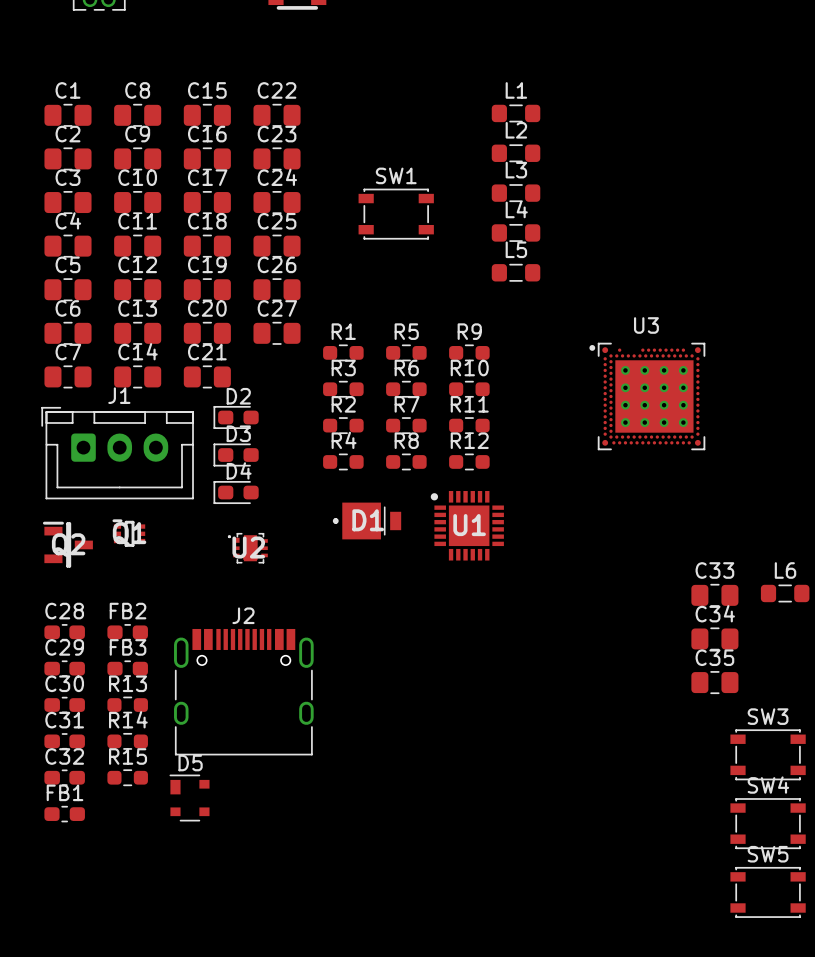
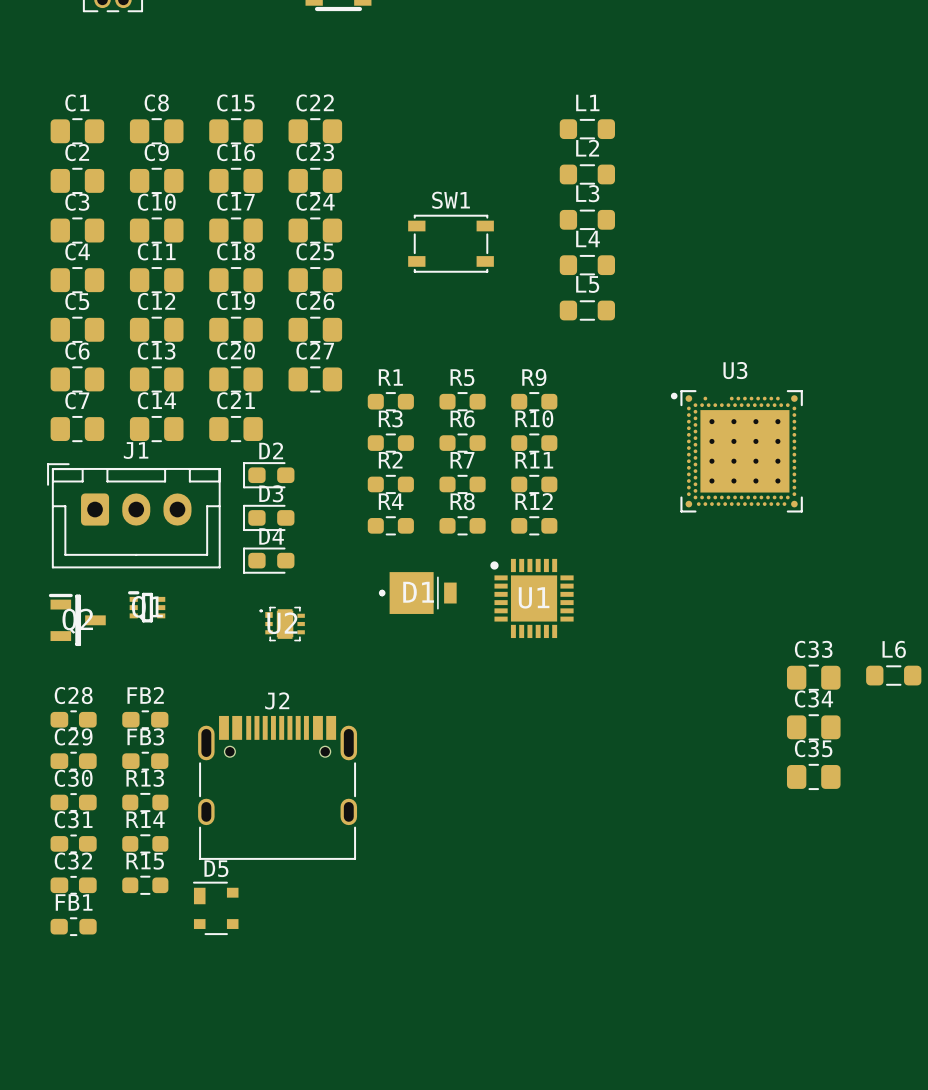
SW3: (768, 754) -> none
SW4: (768, 823) -> none
SW5: (768, 892) -> none

